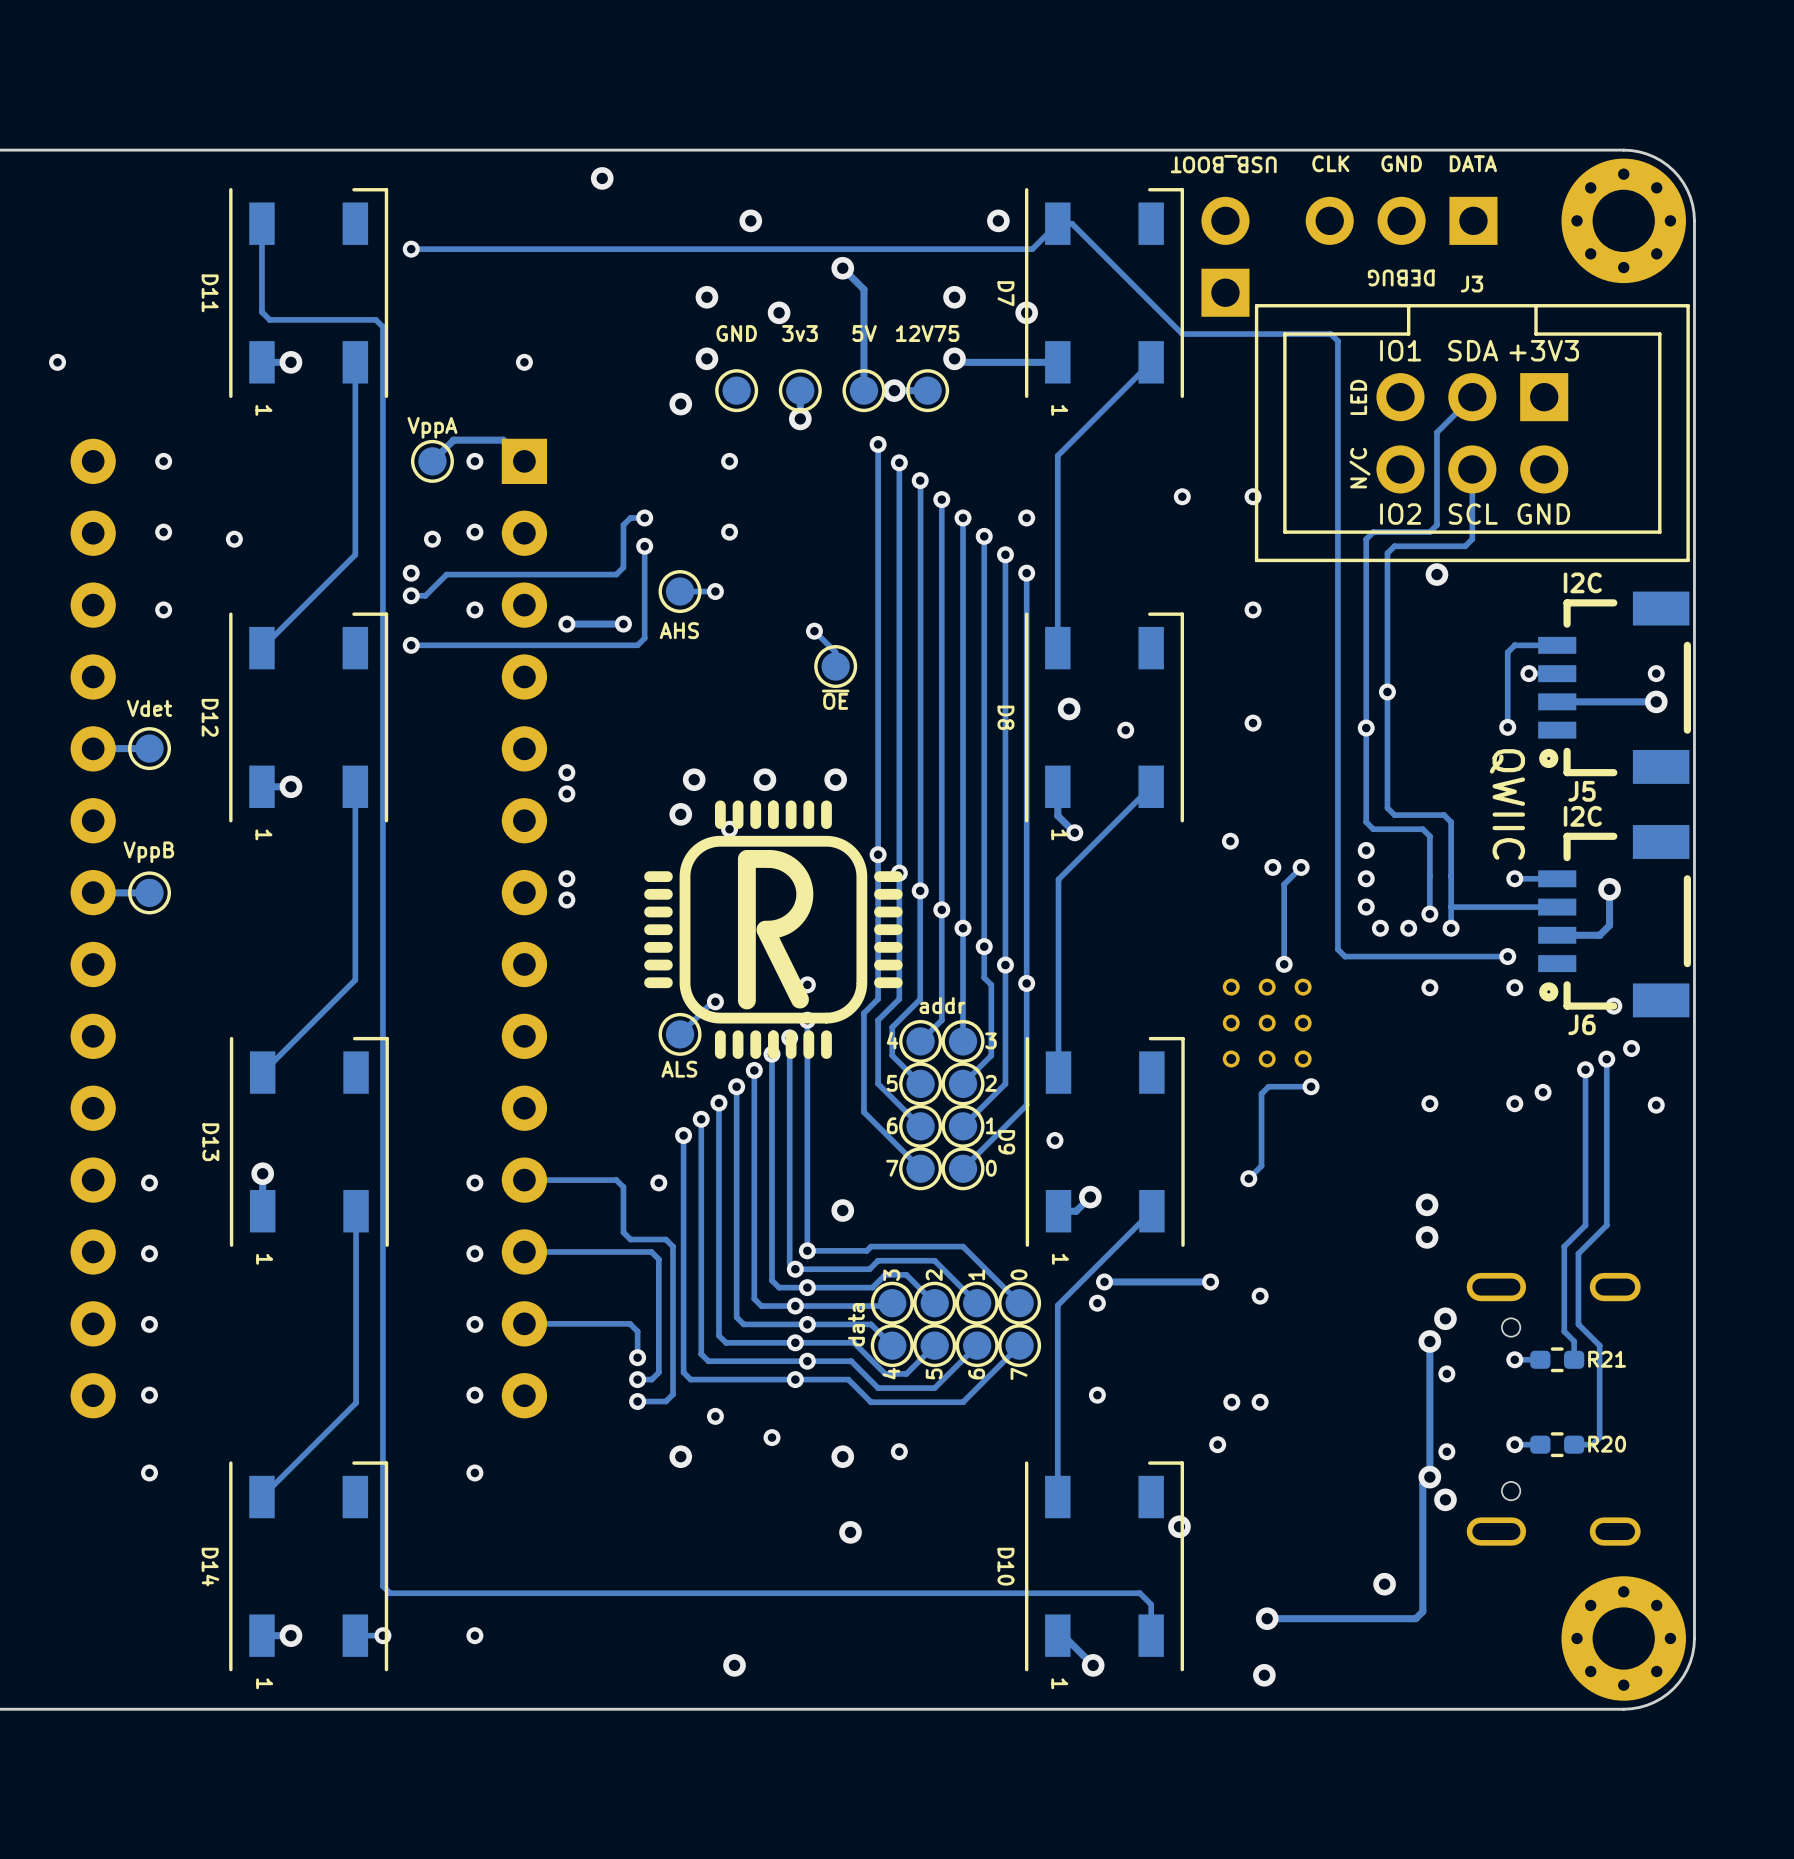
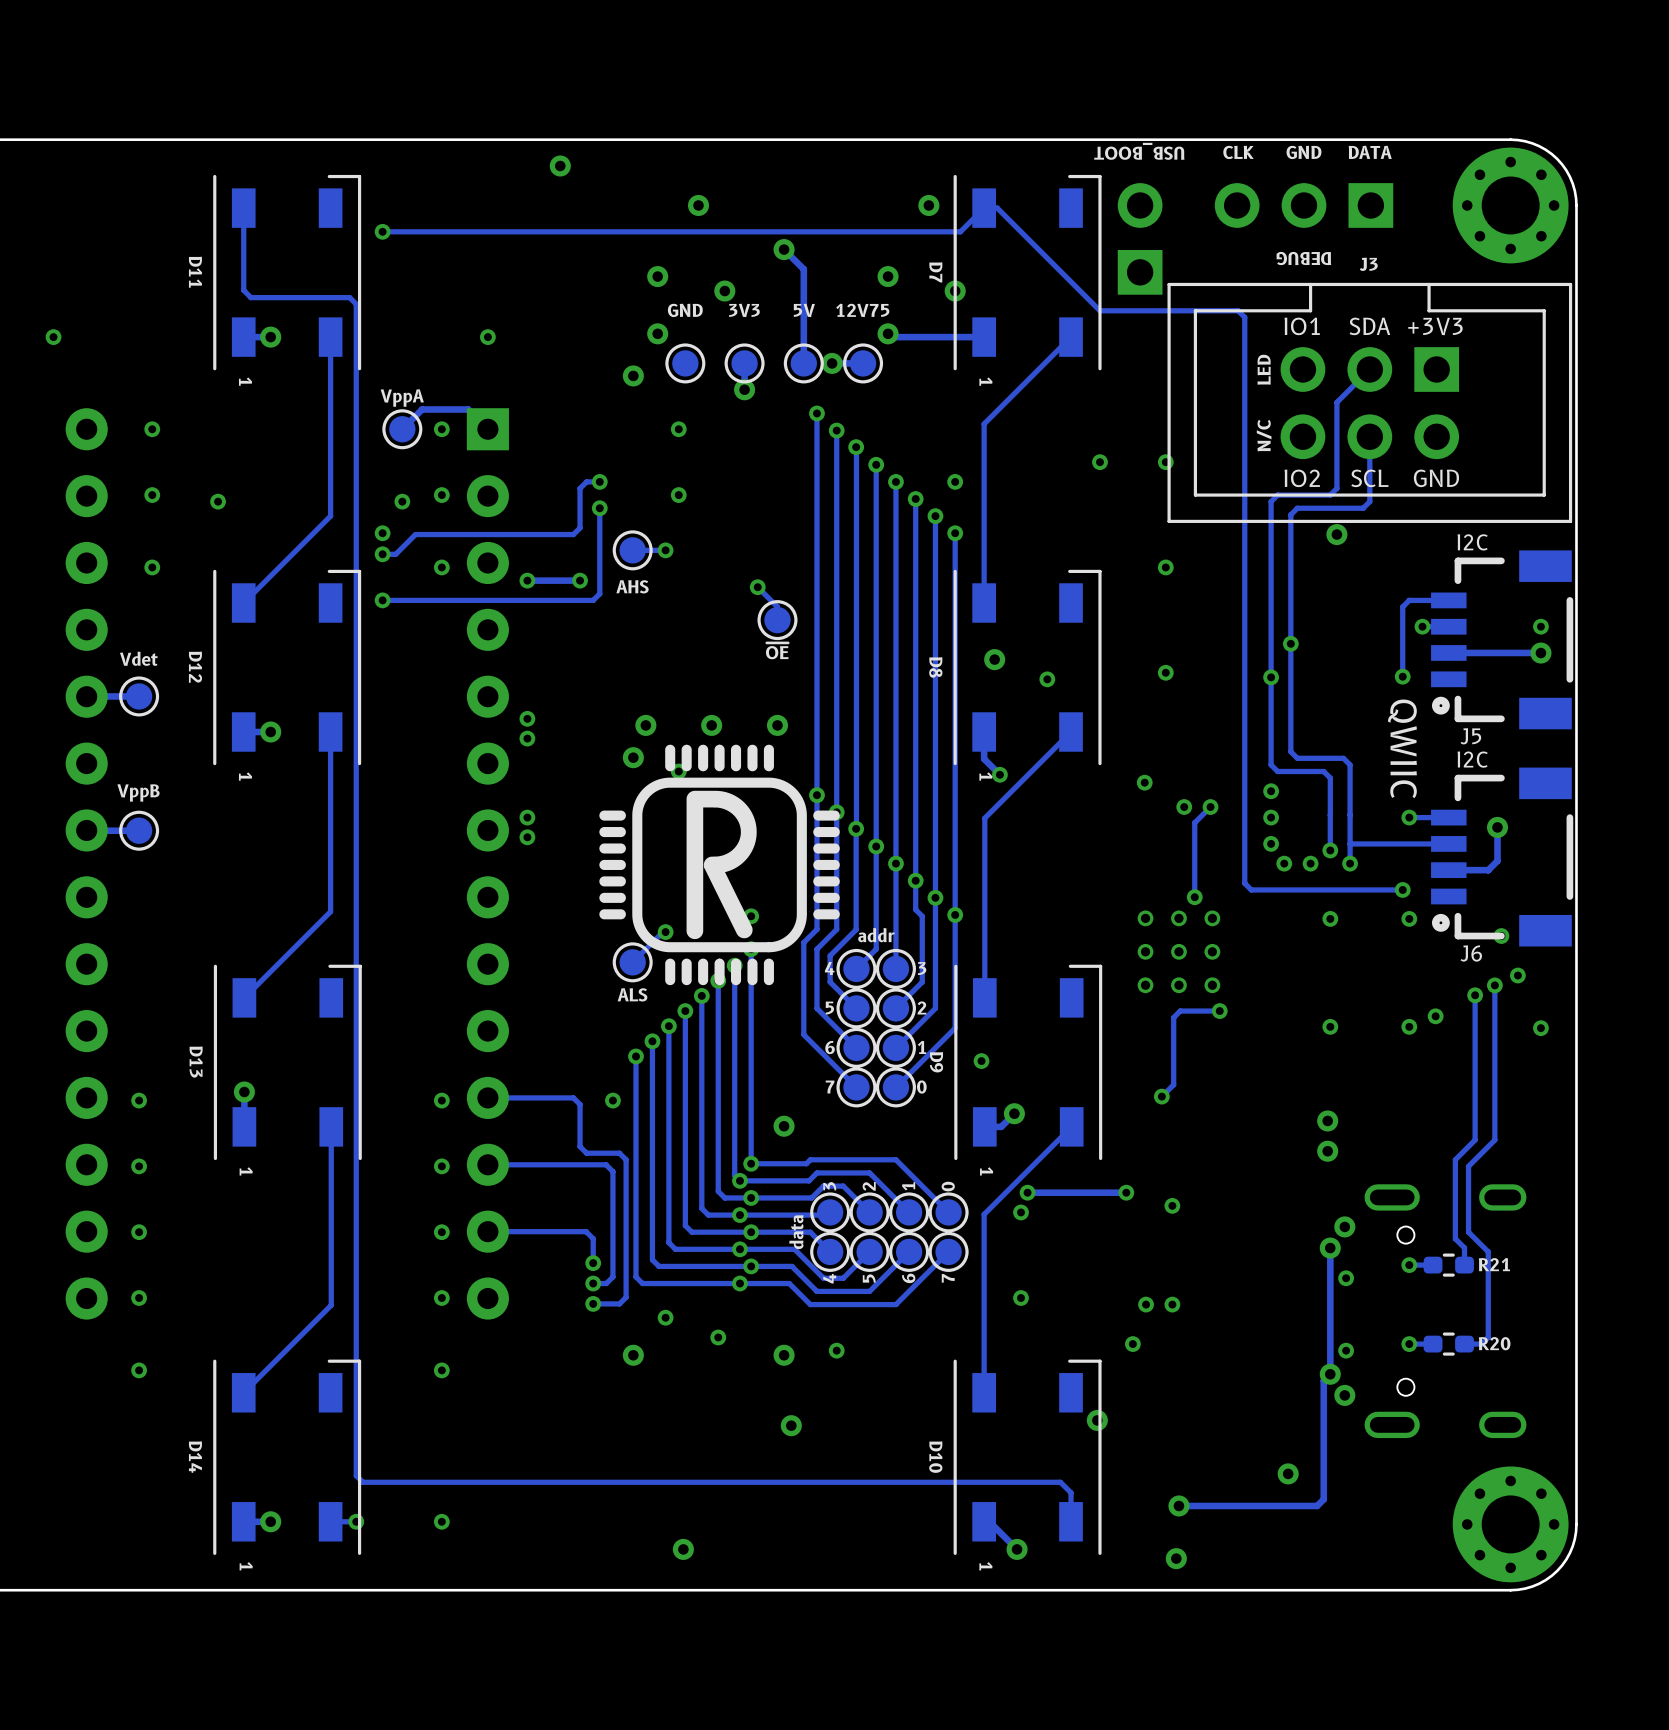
text: 3v3 (799, 333) -> 3V3 (744, 310)

